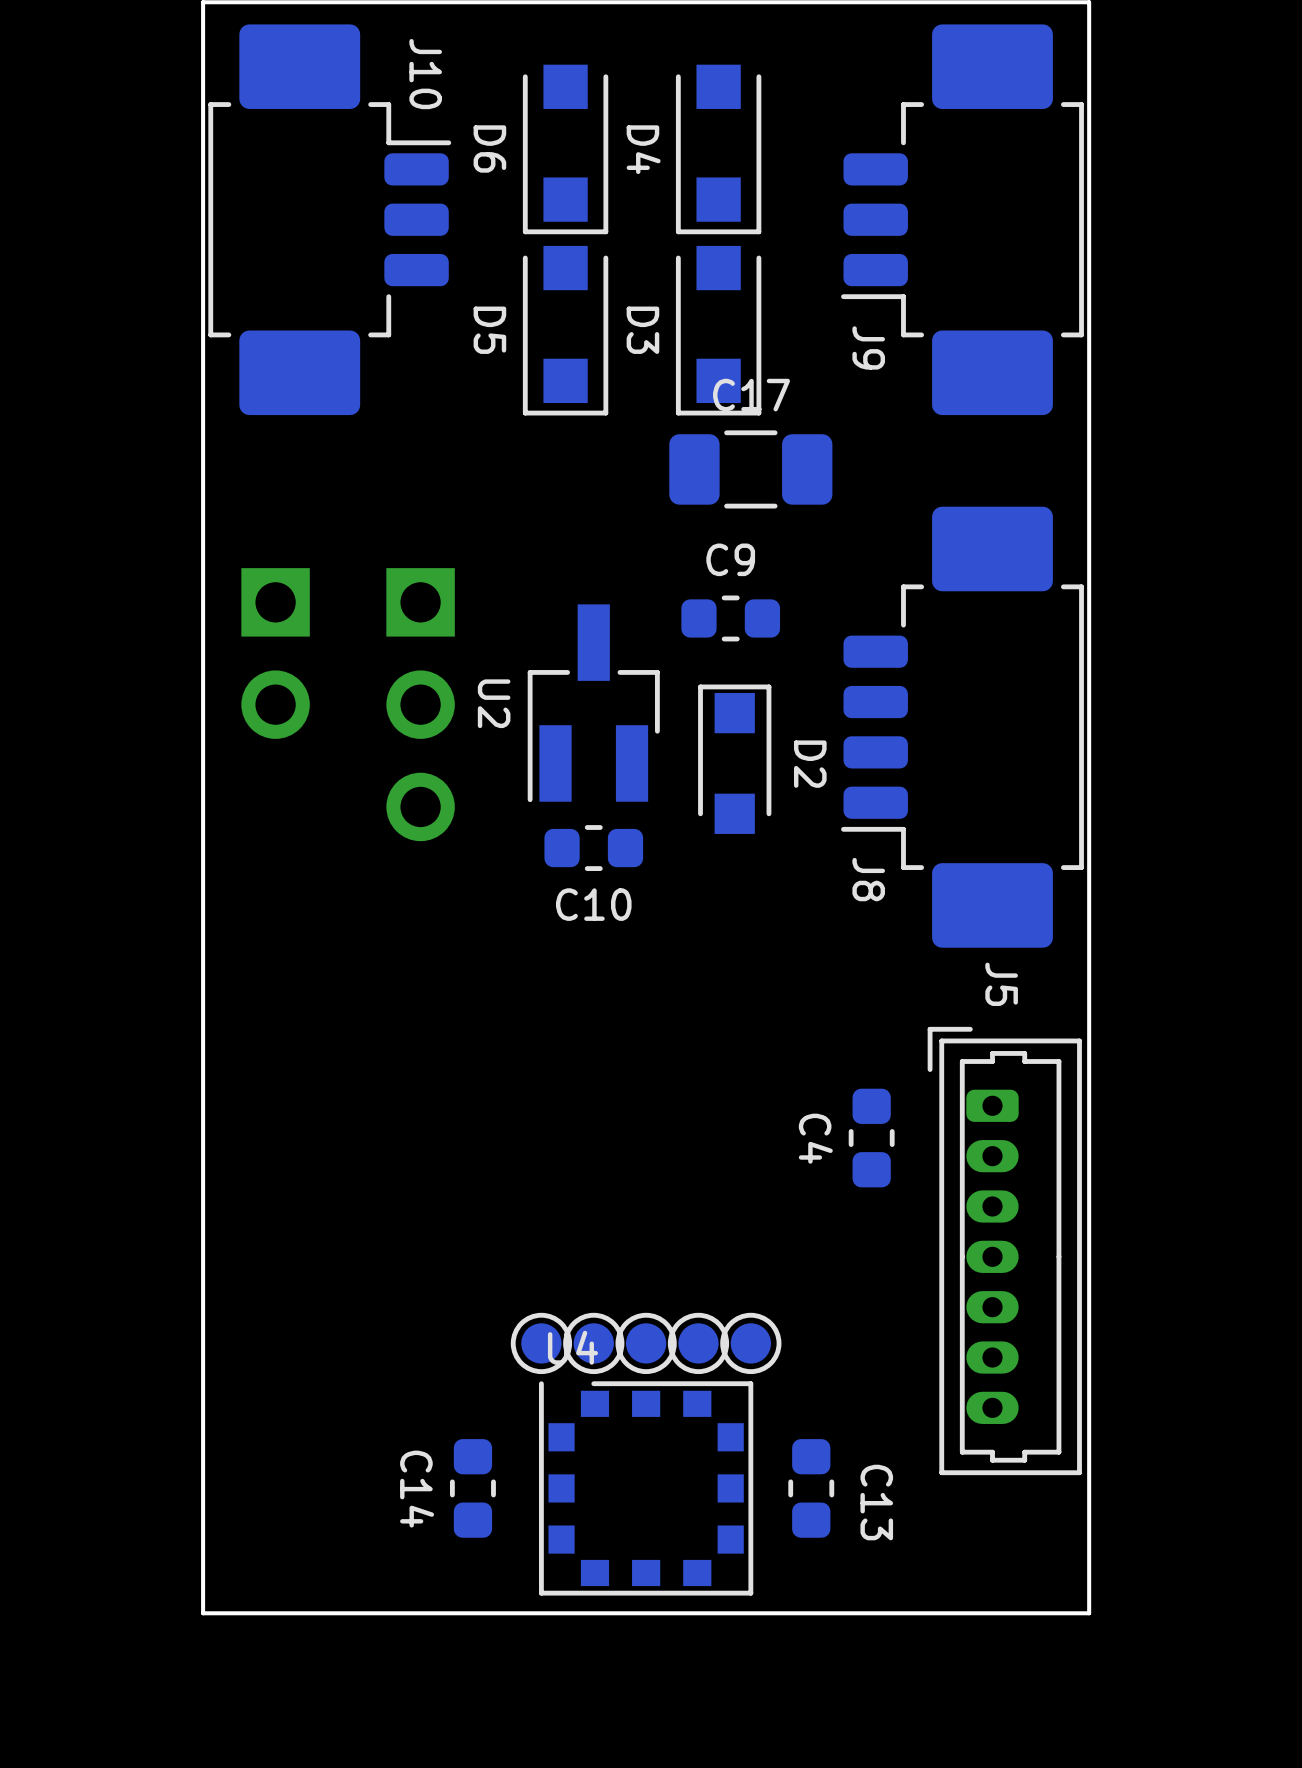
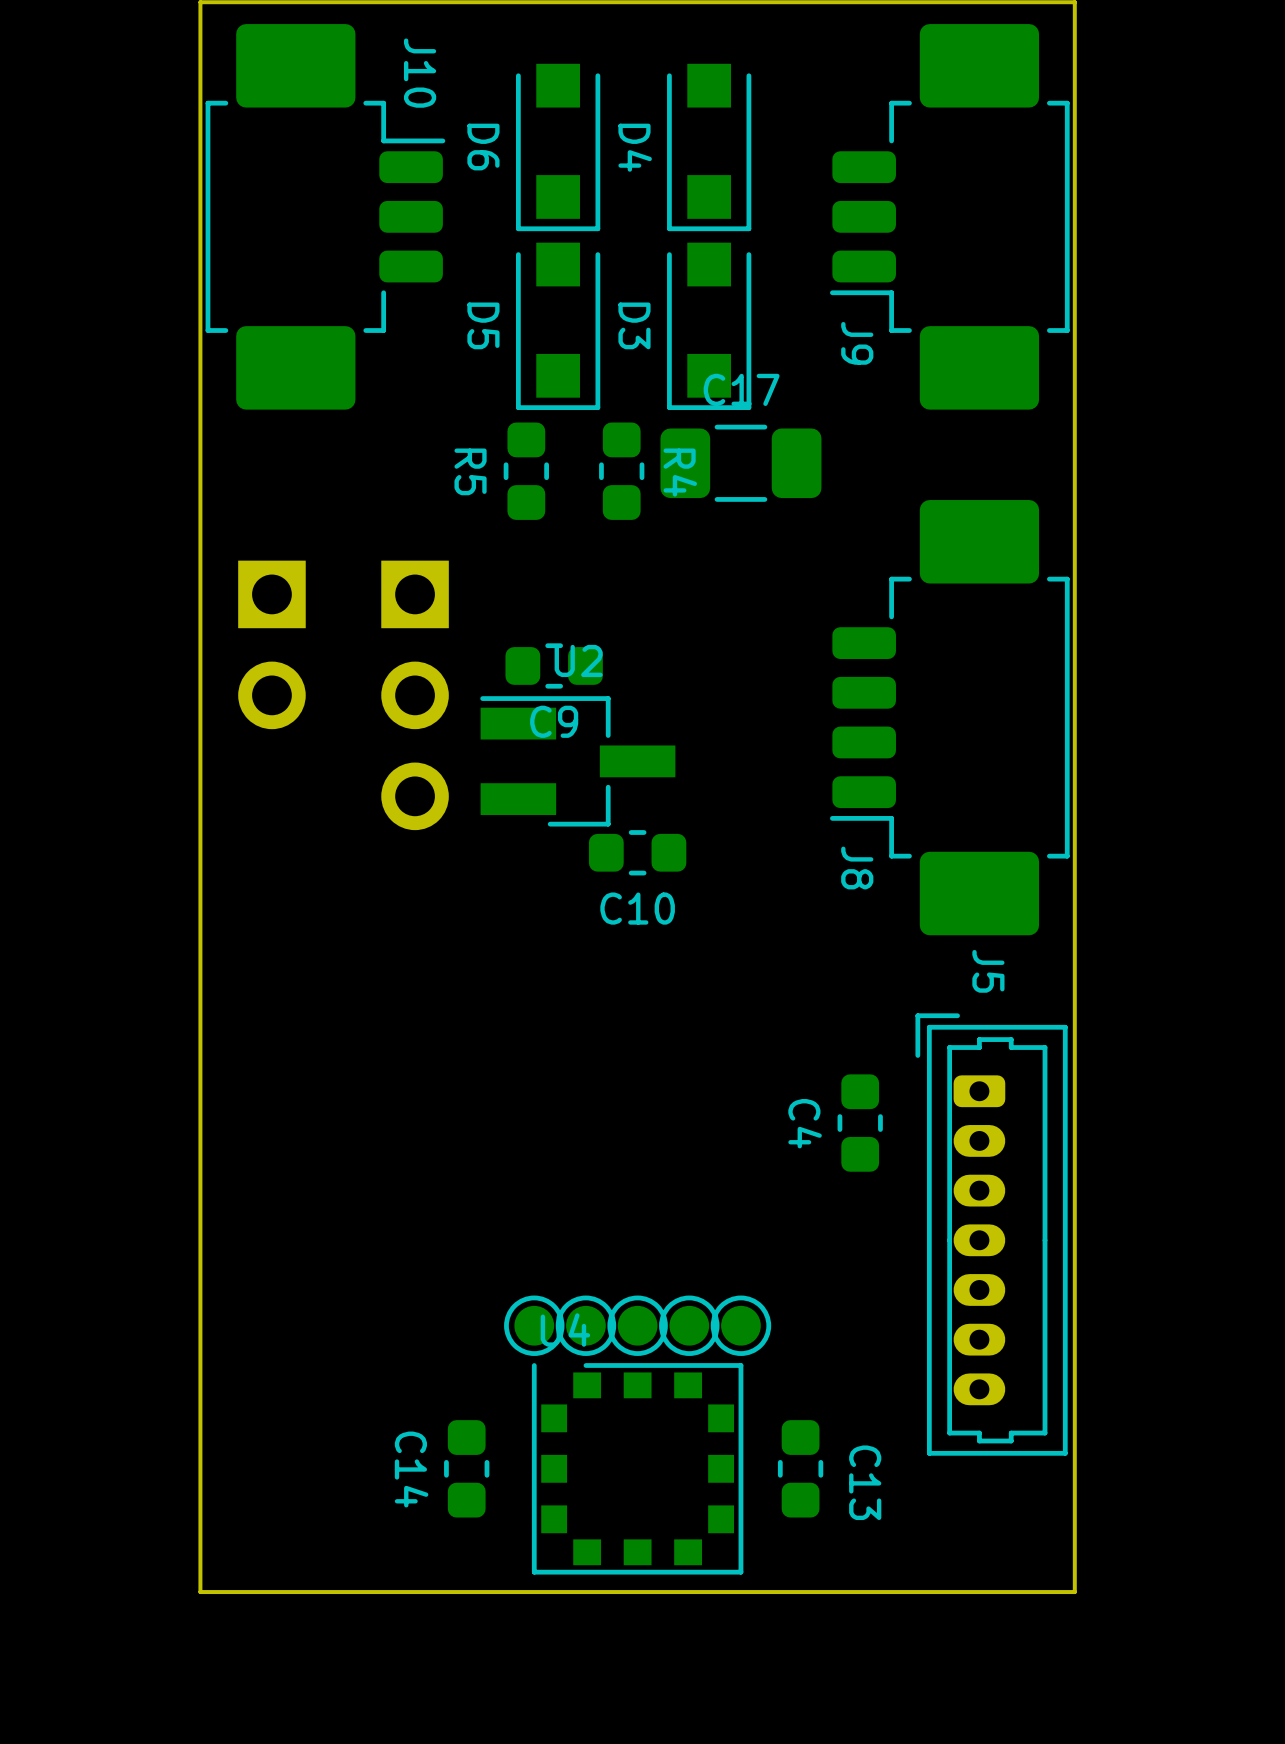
R5: none -> (526, 471)
R4: none -> (621, 471)
C9 name position: C9 (730, 559) -> C9 (554, 721)
C9 position: (730, 618) -> (554, 665)
U2 rotation: 0° (593, 703) -> 90° clockwise (577, 761)
D2: (734, 759) -> none
C10 position: (593, 848) -> (637, 852)

